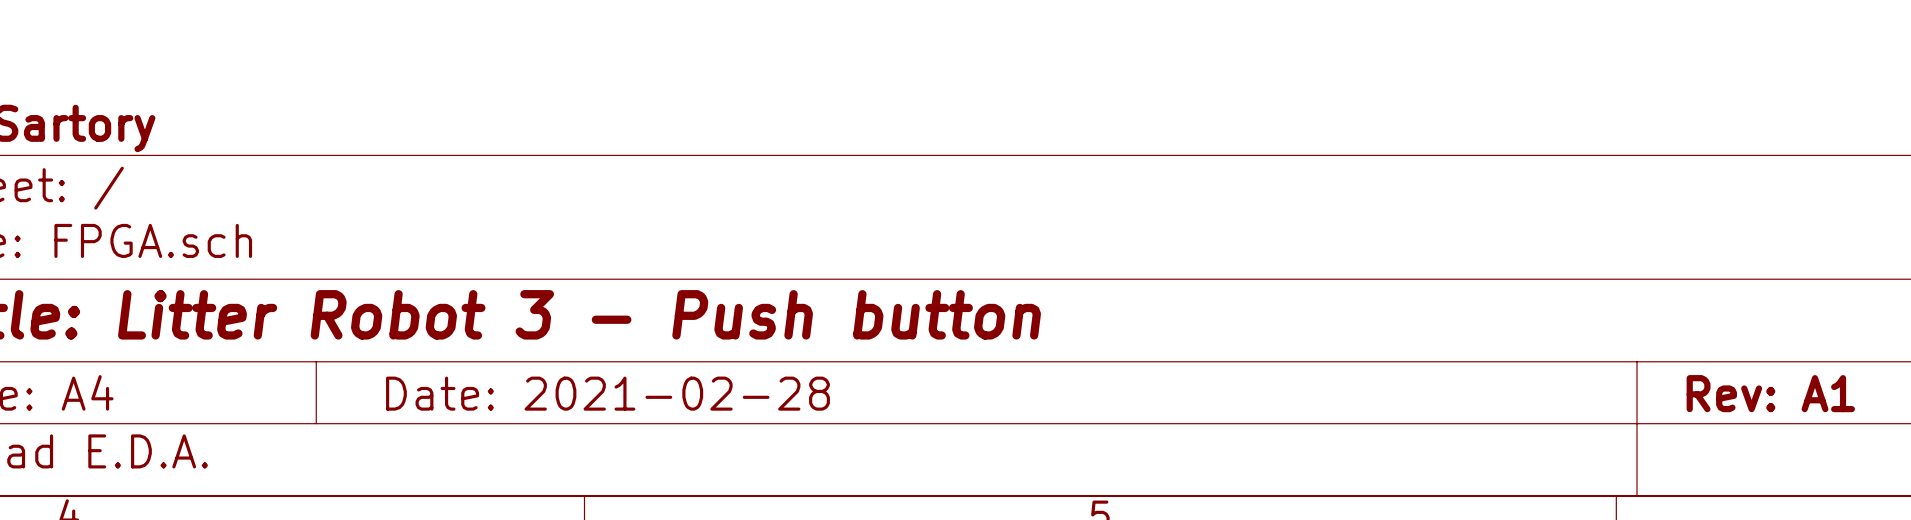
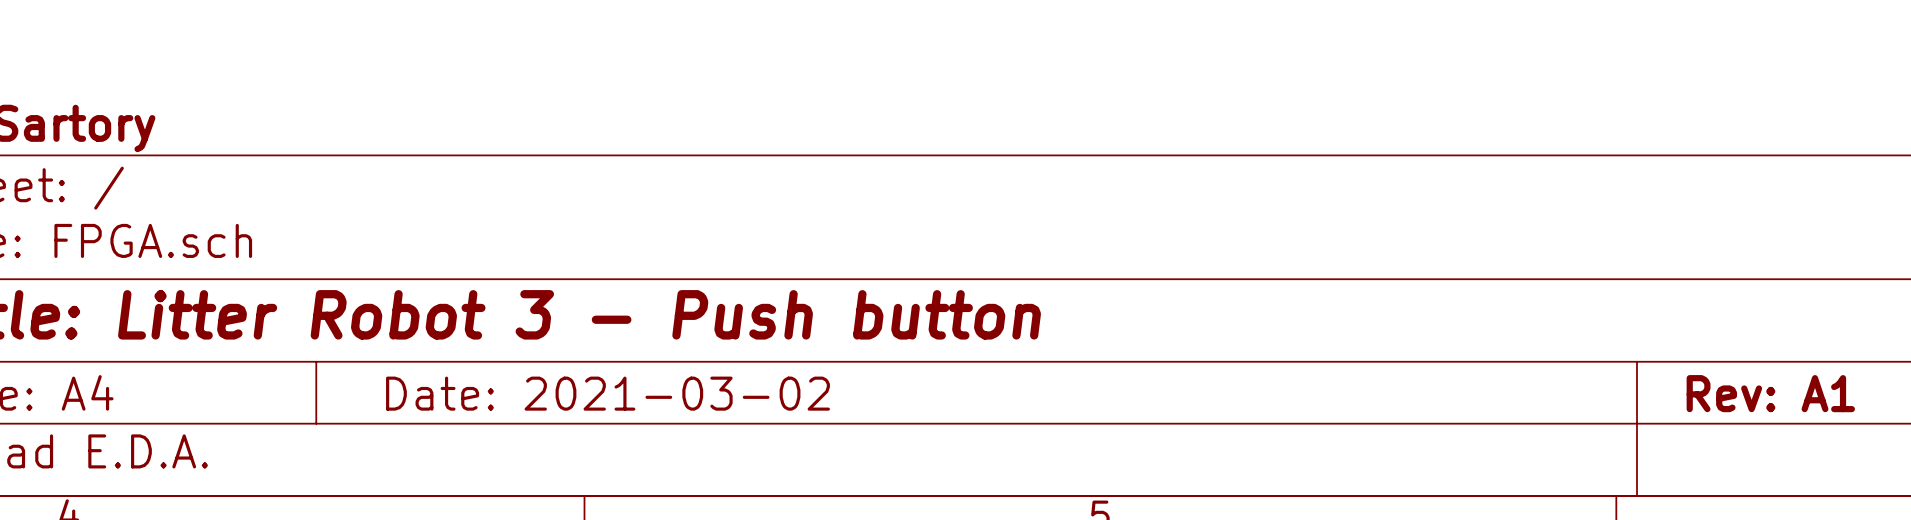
title block: Date: 2021-02-28 (607, 393) -> Date: 2021-03-02 (607, 393)

